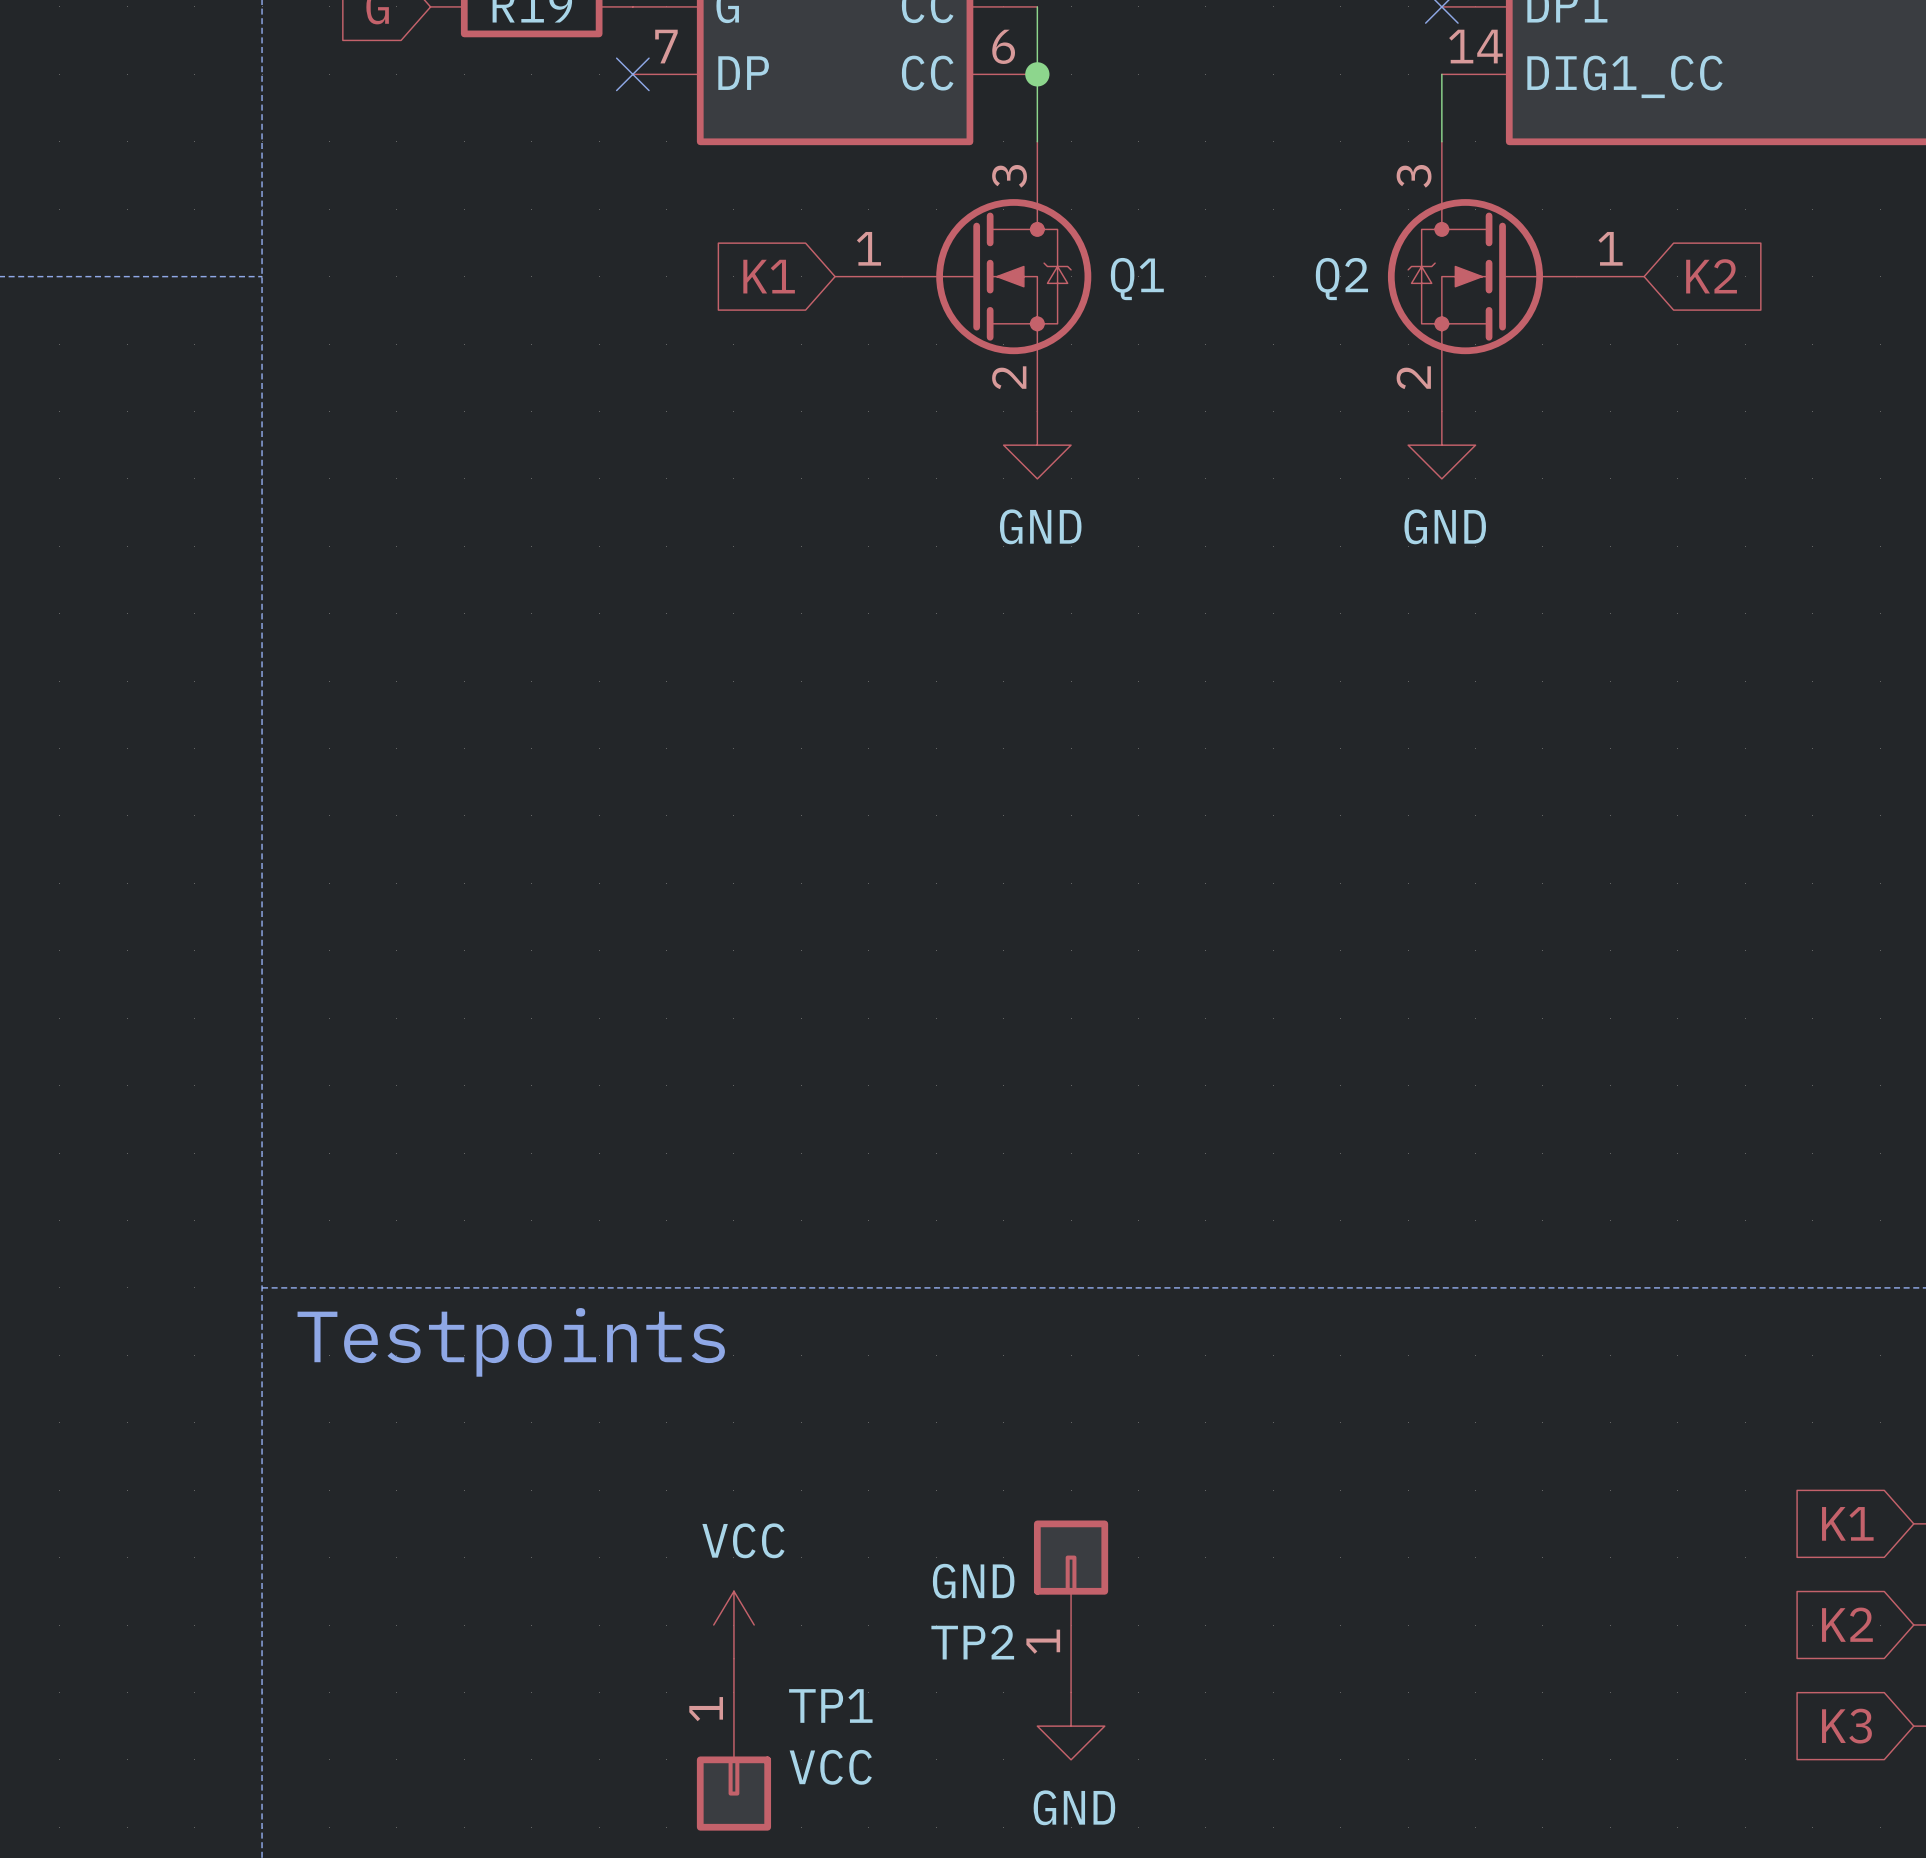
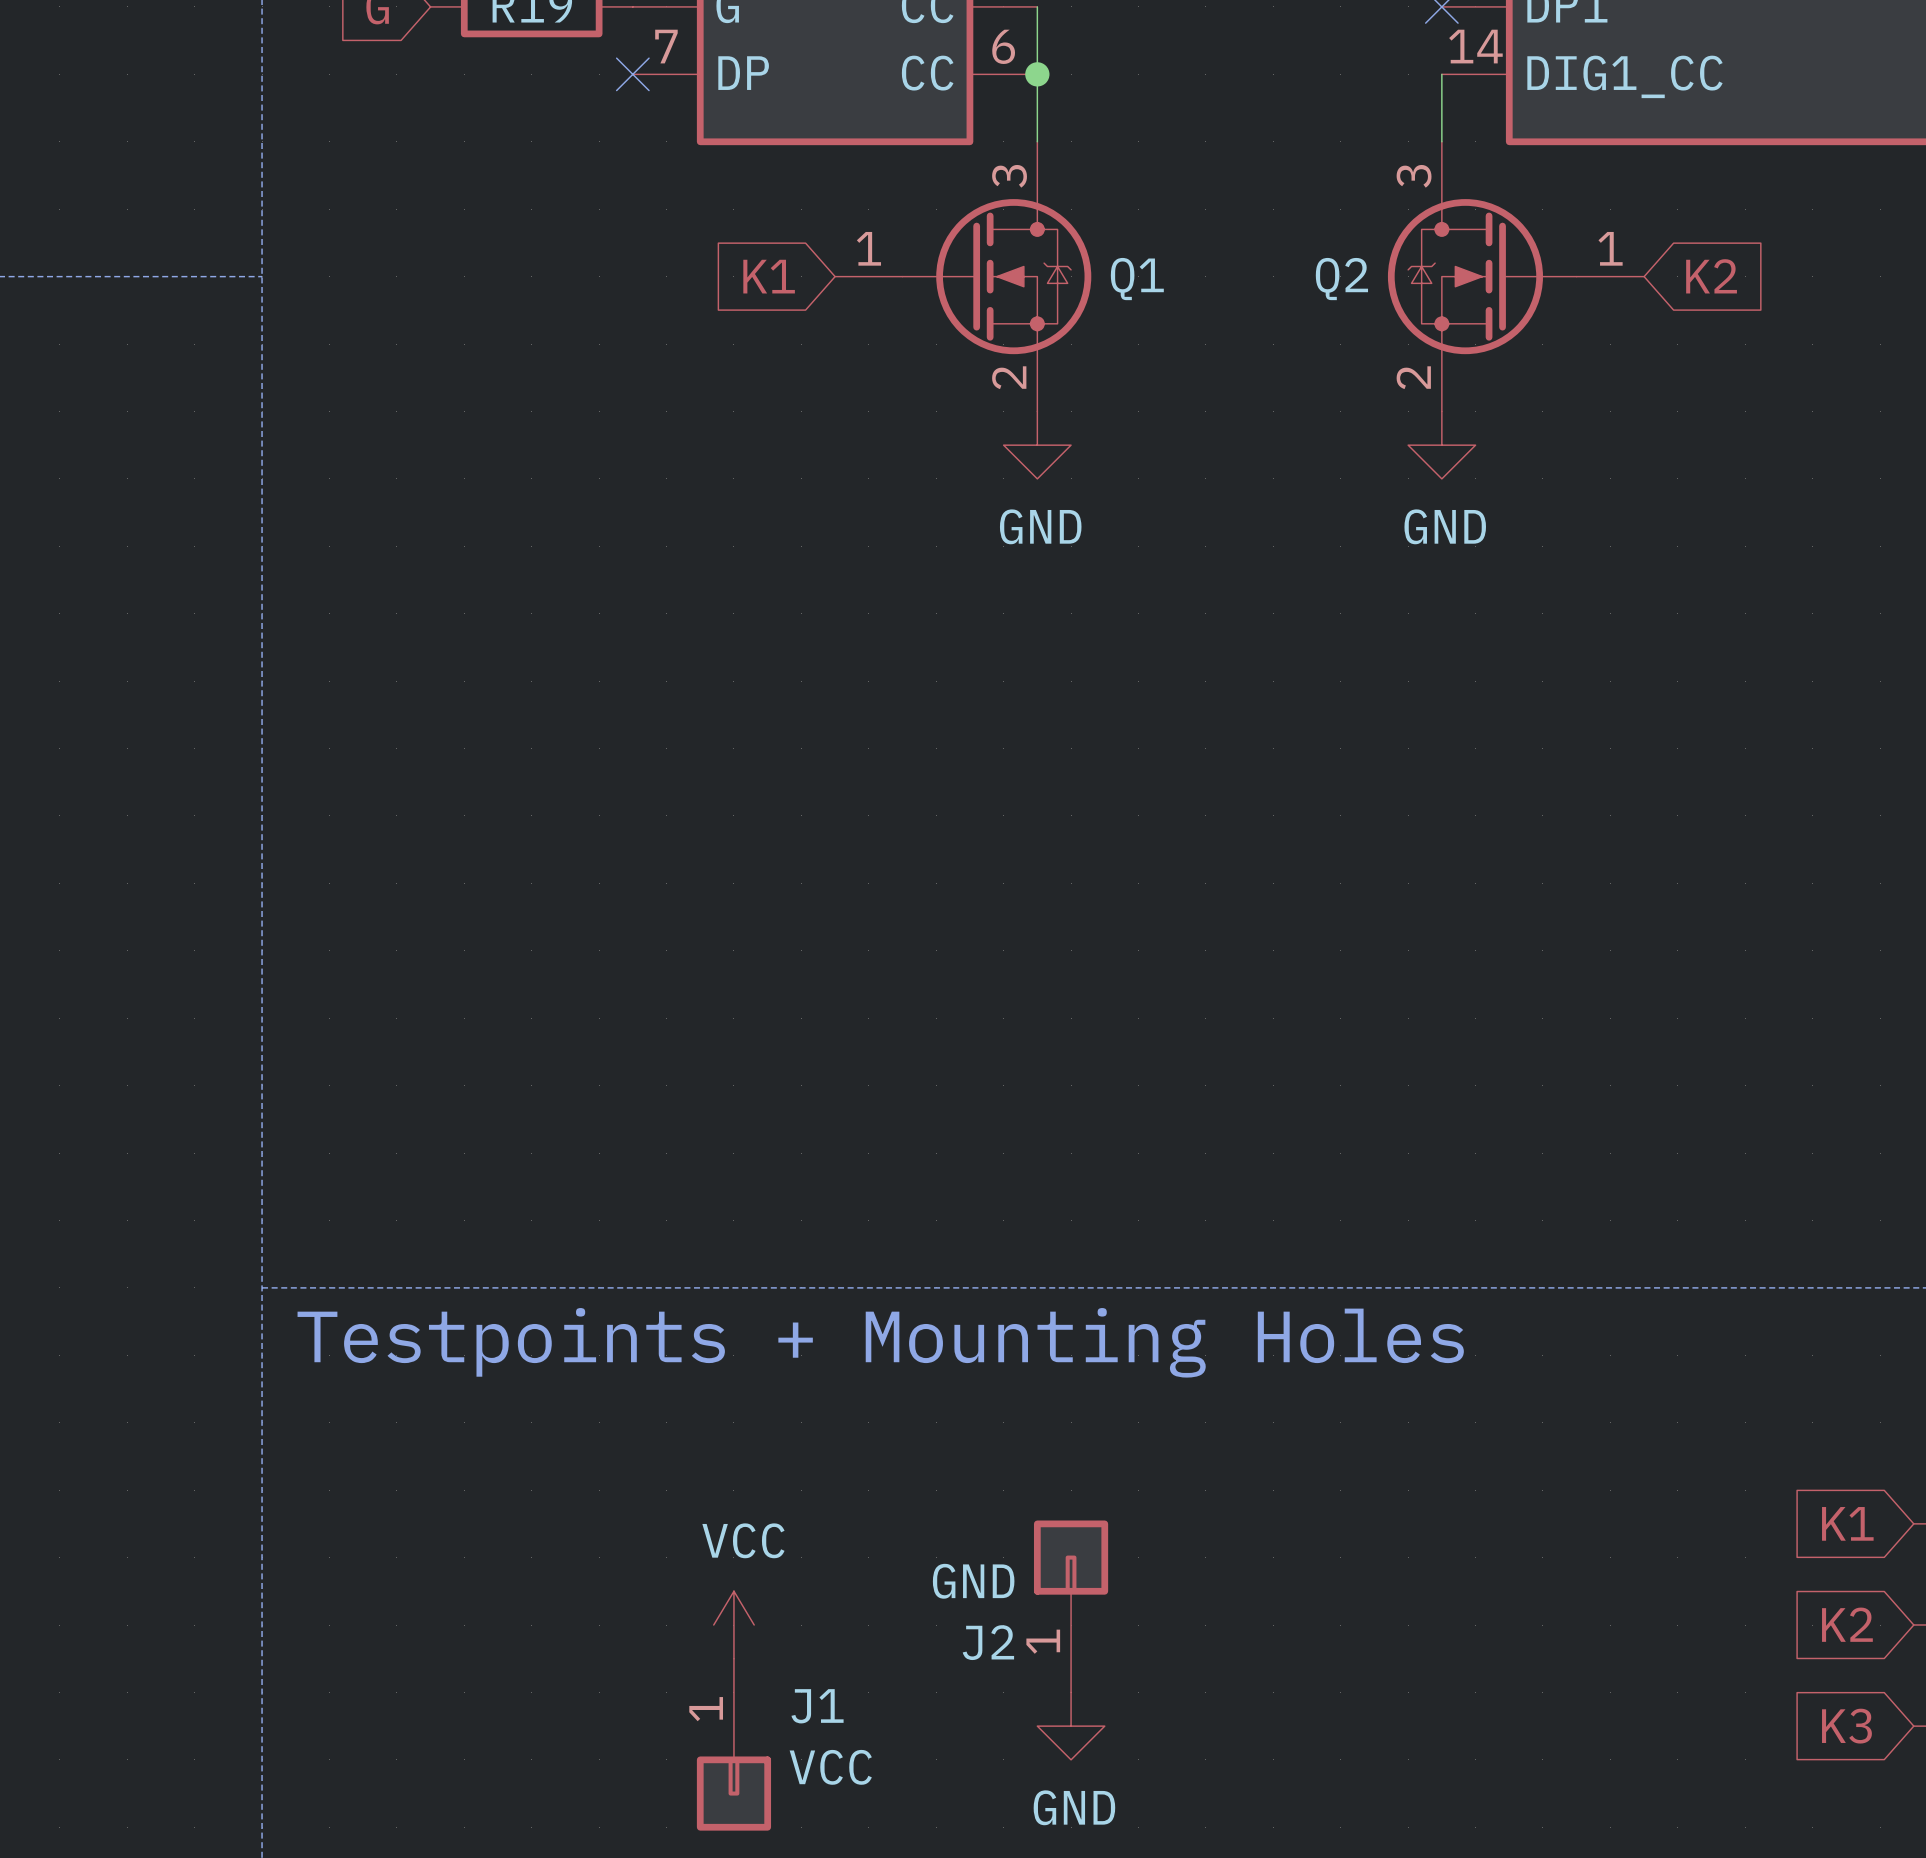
text: Testpoints (511, 1342) -> Testpoints + Mounting Holes (880, 1342)
TP2 name: TP2 (972, 1642) -> J2 (988, 1642)
TP1 name: TP1 (830, 1705) -> J1 (817, 1706)

